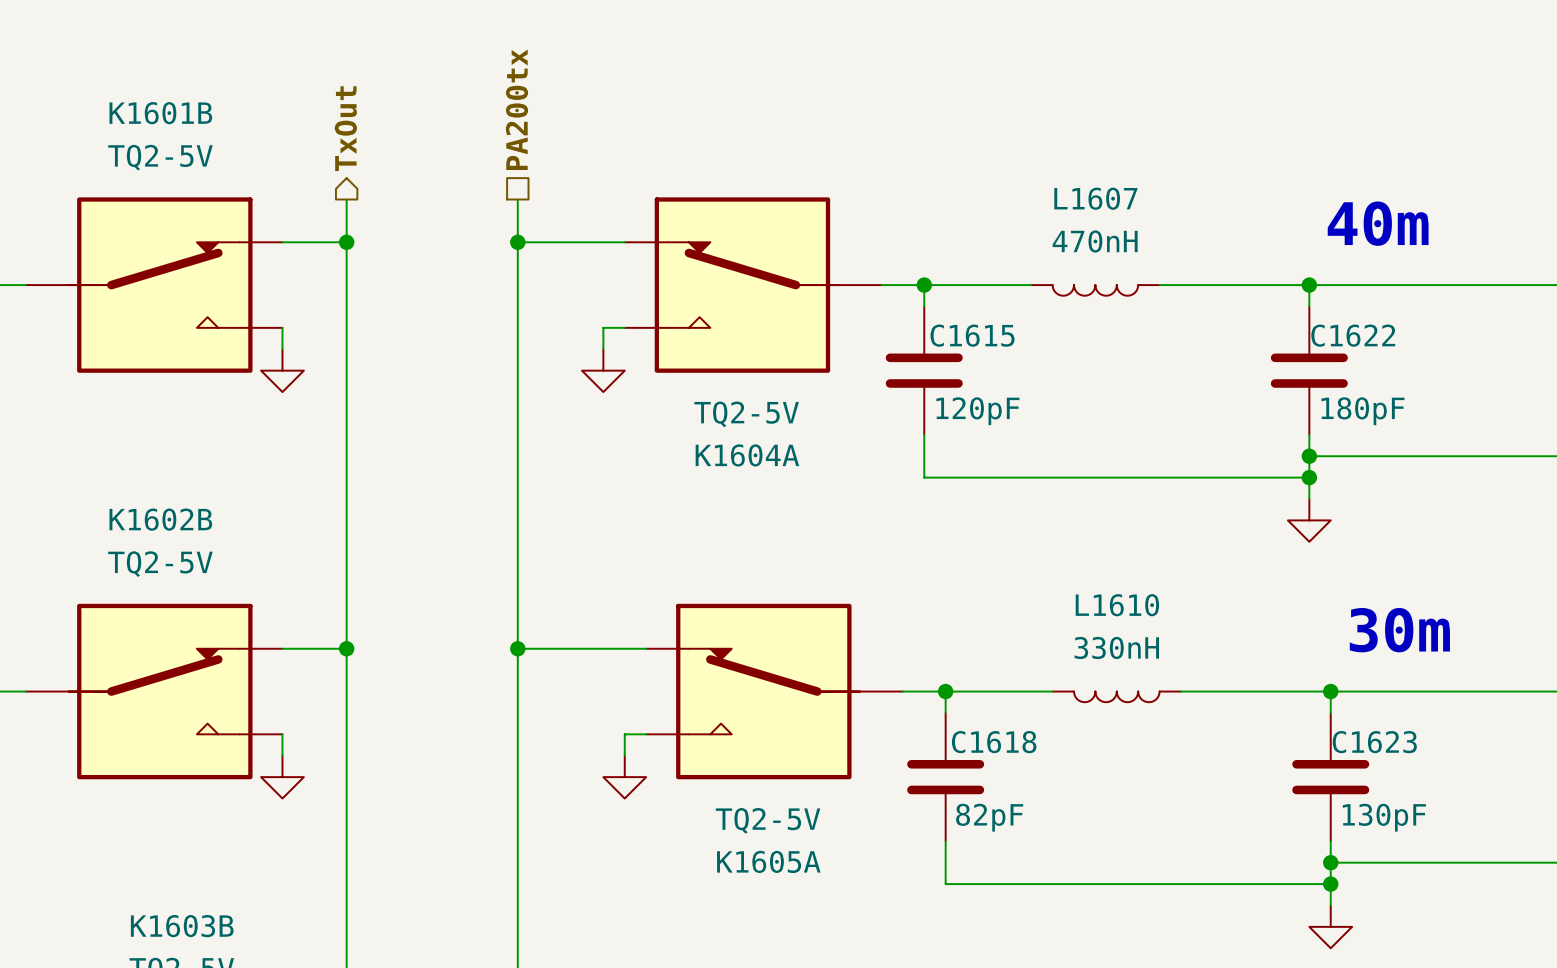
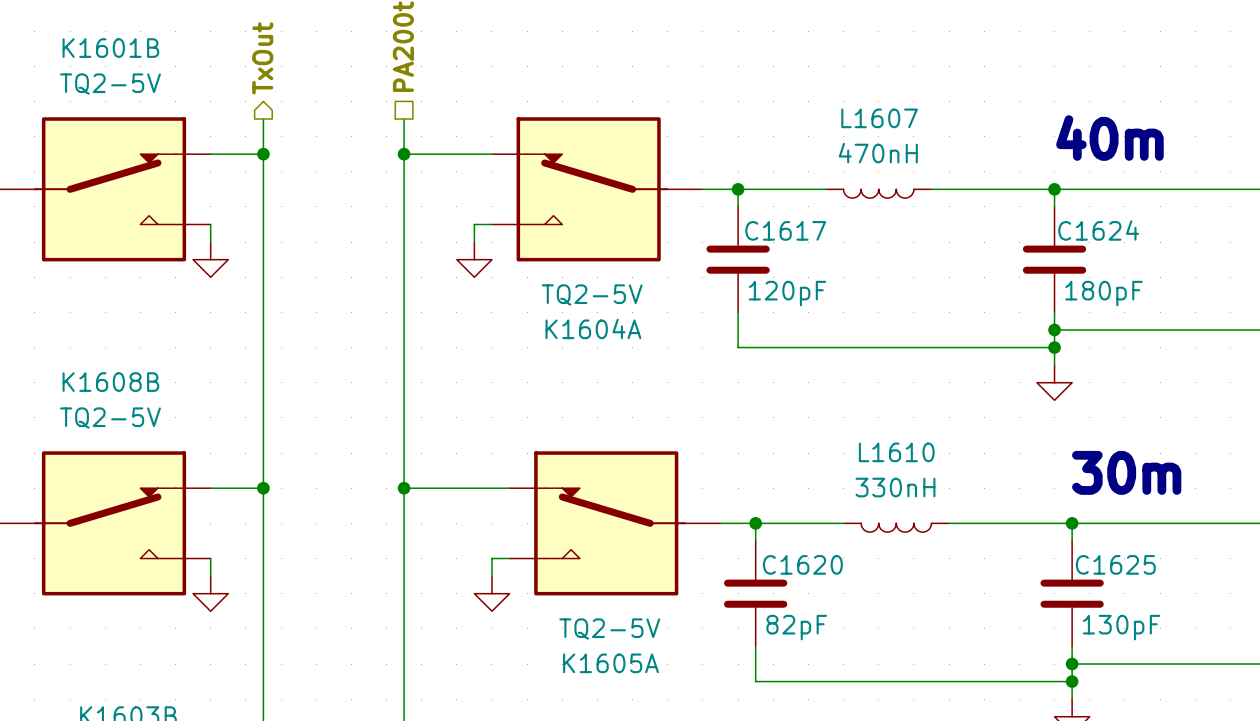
C1615 name: C1615 (972, 335) -> C1617 (785, 230)
C1622 name: C1622 (1353, 335) -> C1624 (1098, 230)
K1602B name: K1602B (160, 519) -> K1608B (110, 382)
C1618 name: C1618 (994, 742) -> C1620 (802, 564)
C1623 name: C1623 (1374, 742) -> C1625 (1115, 564)

